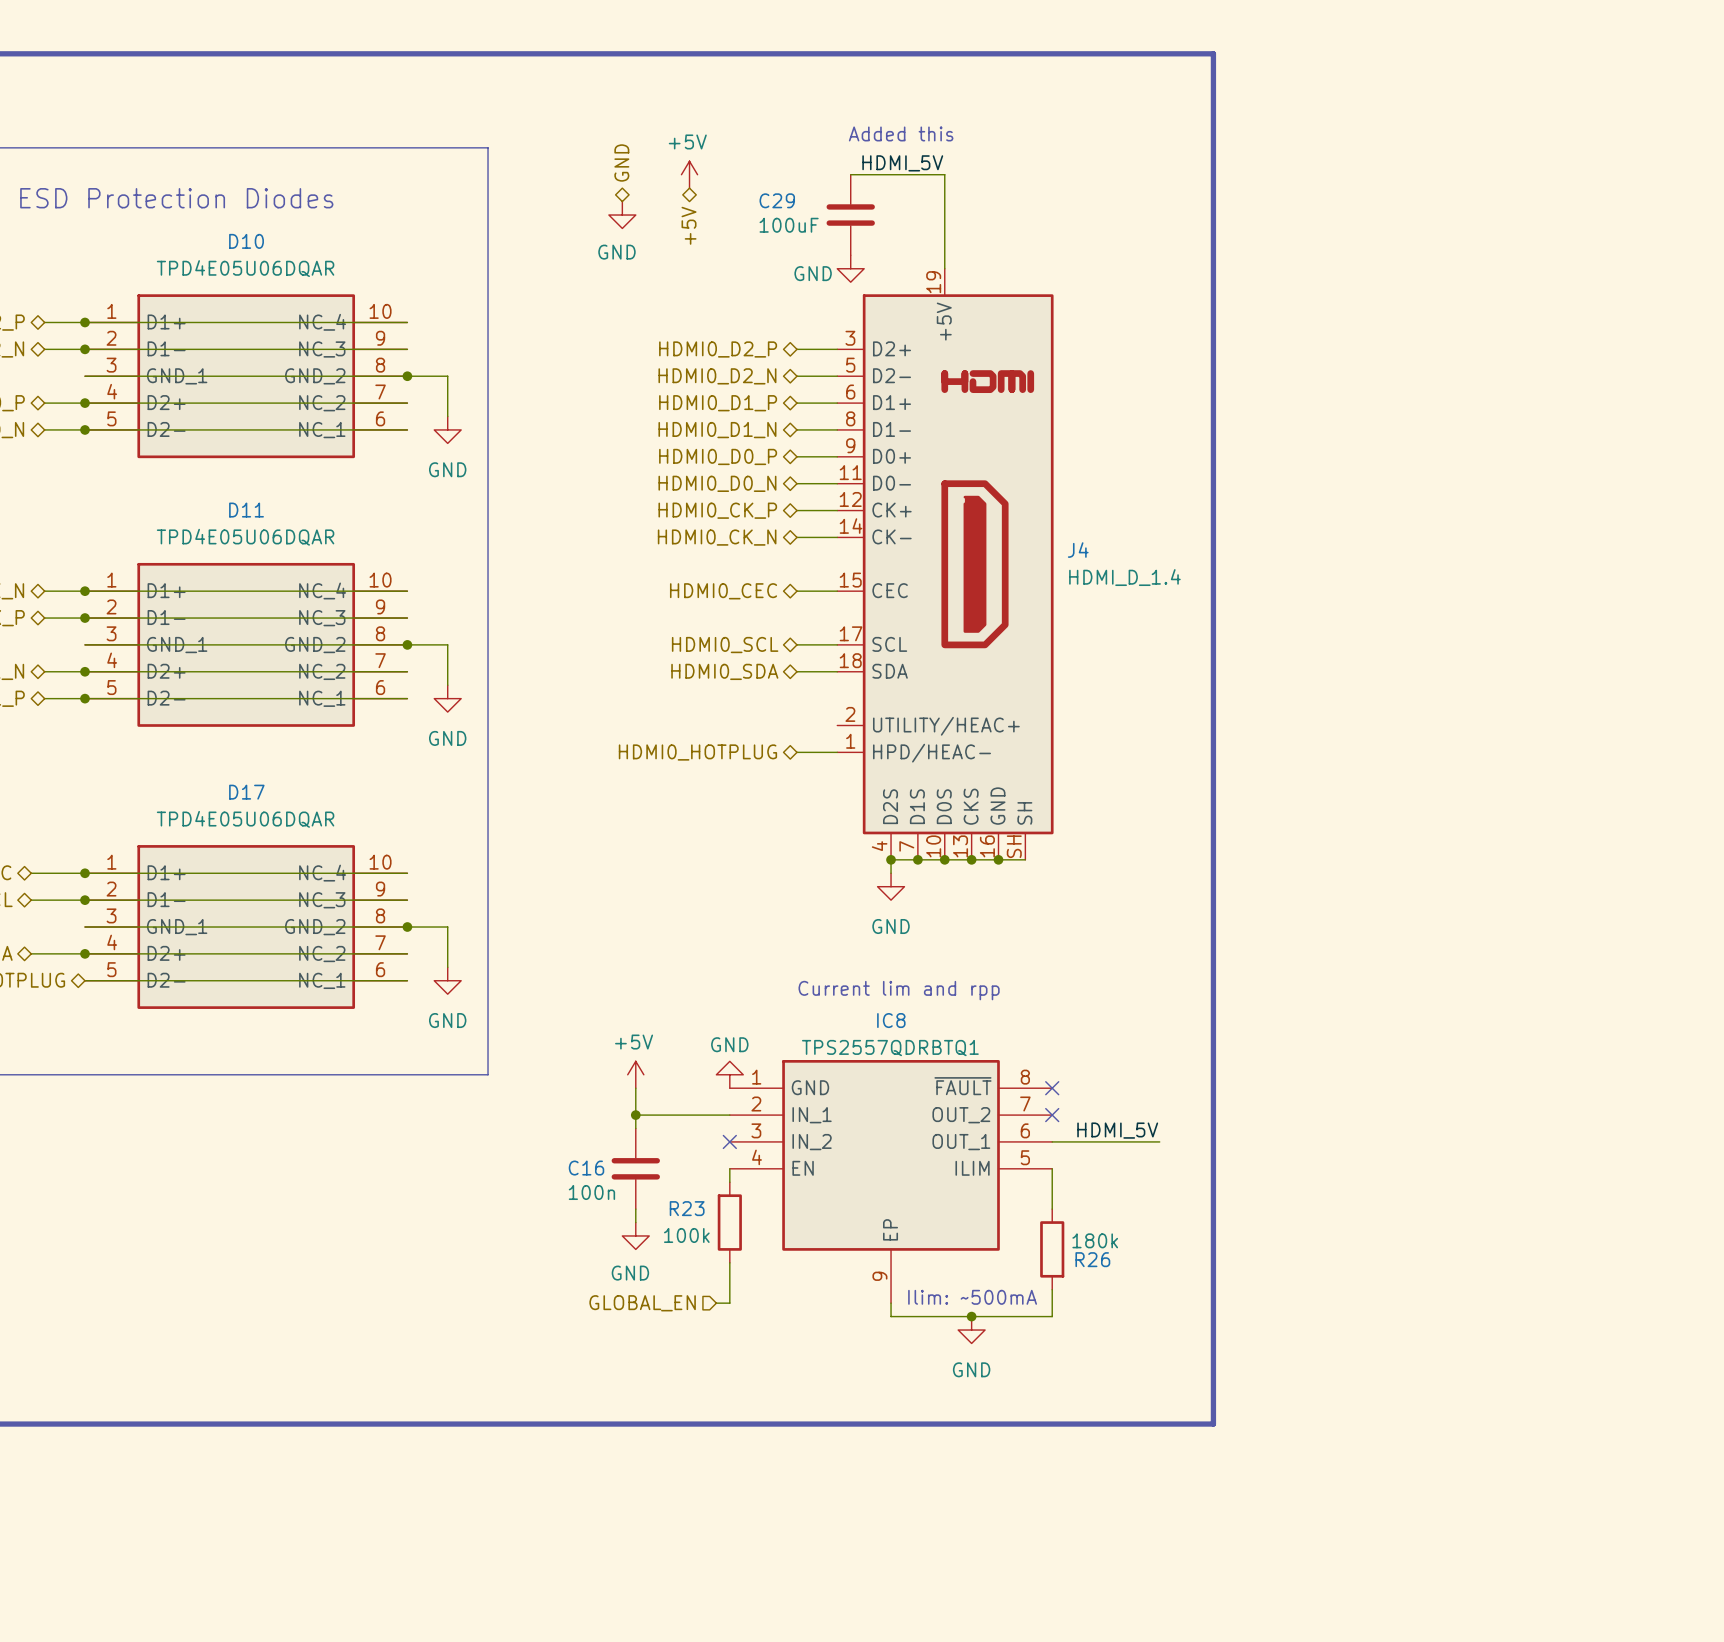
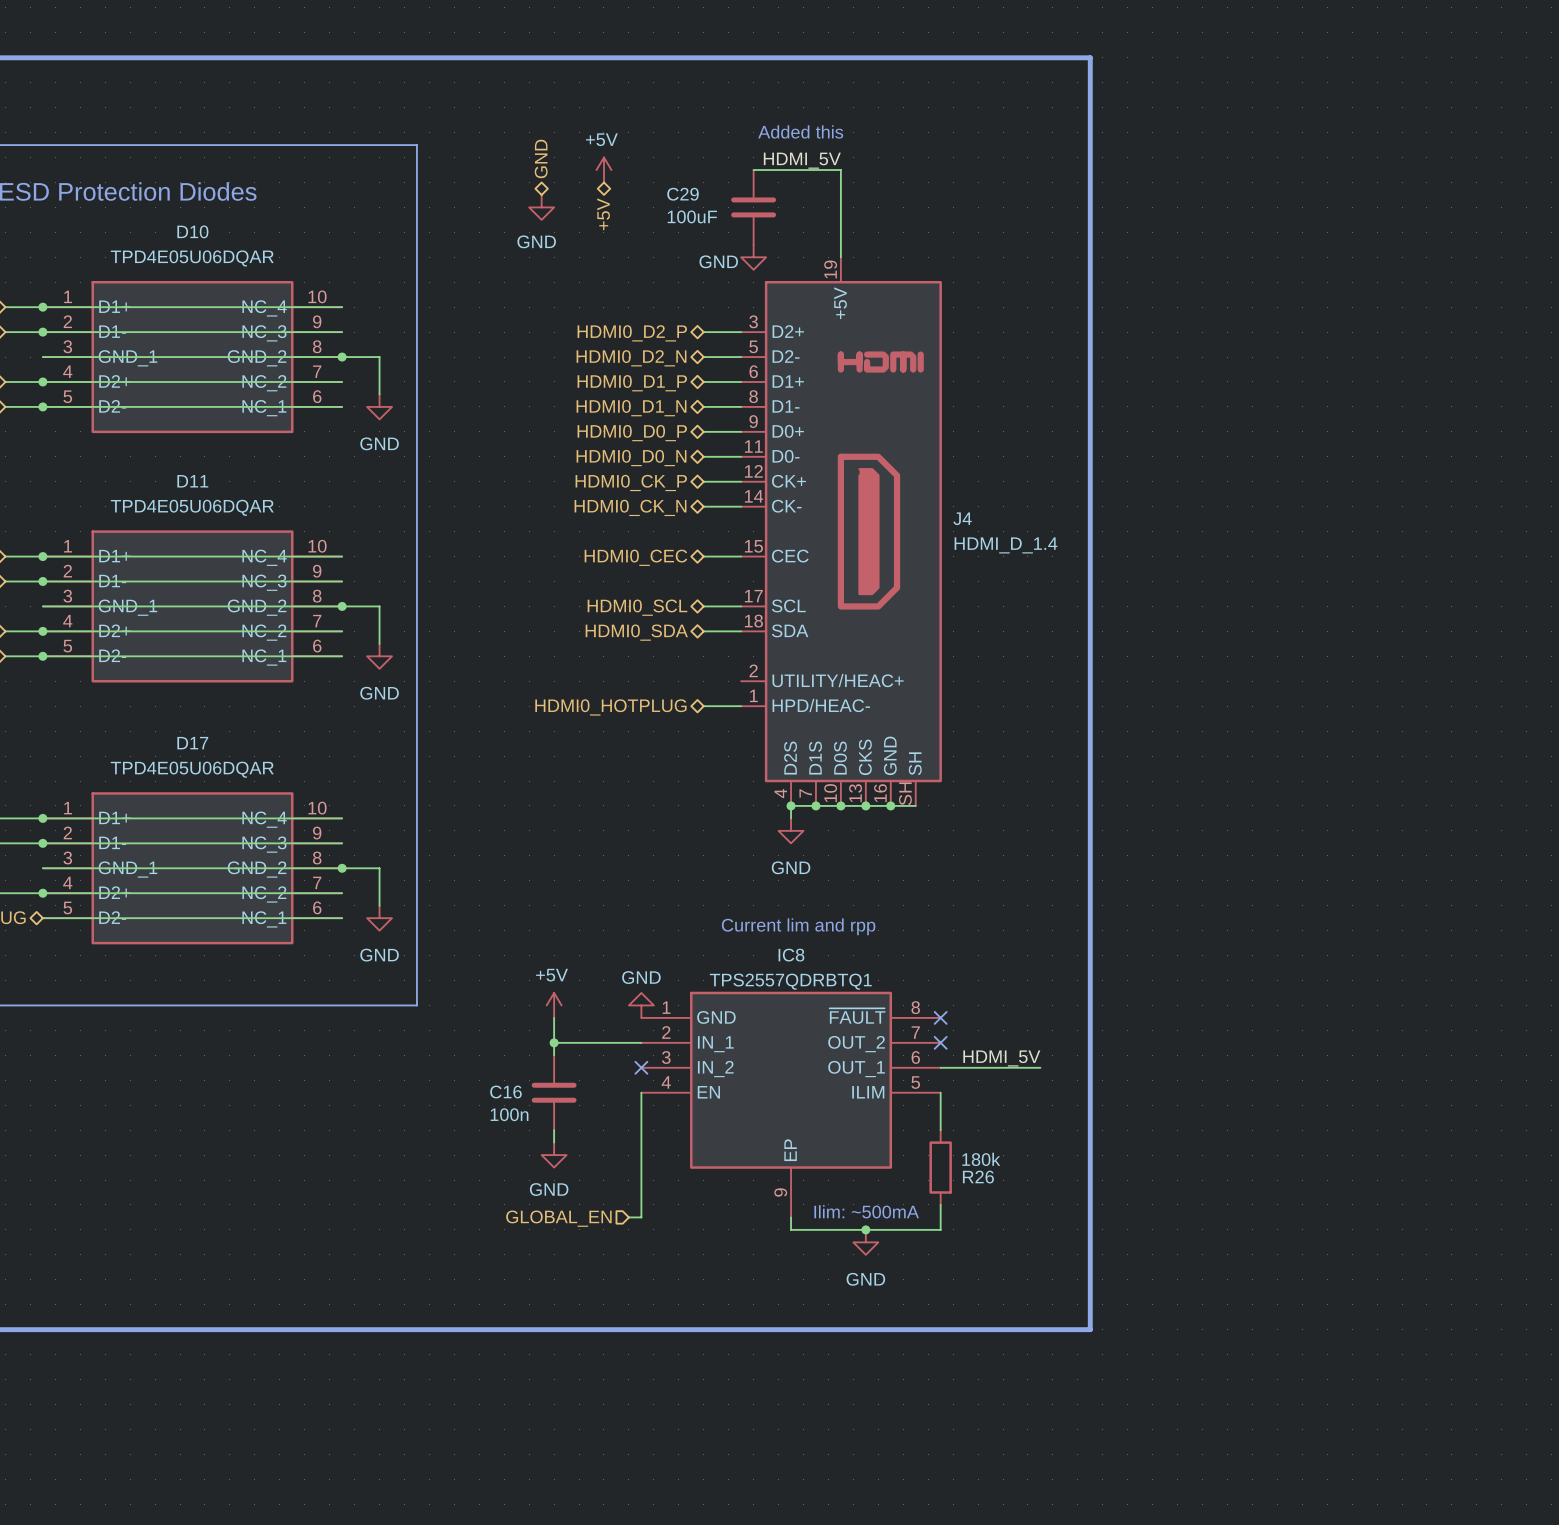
wire: none -> (641, 1105) (641, 1180)
R23: 100k (729, 1222) -> none

